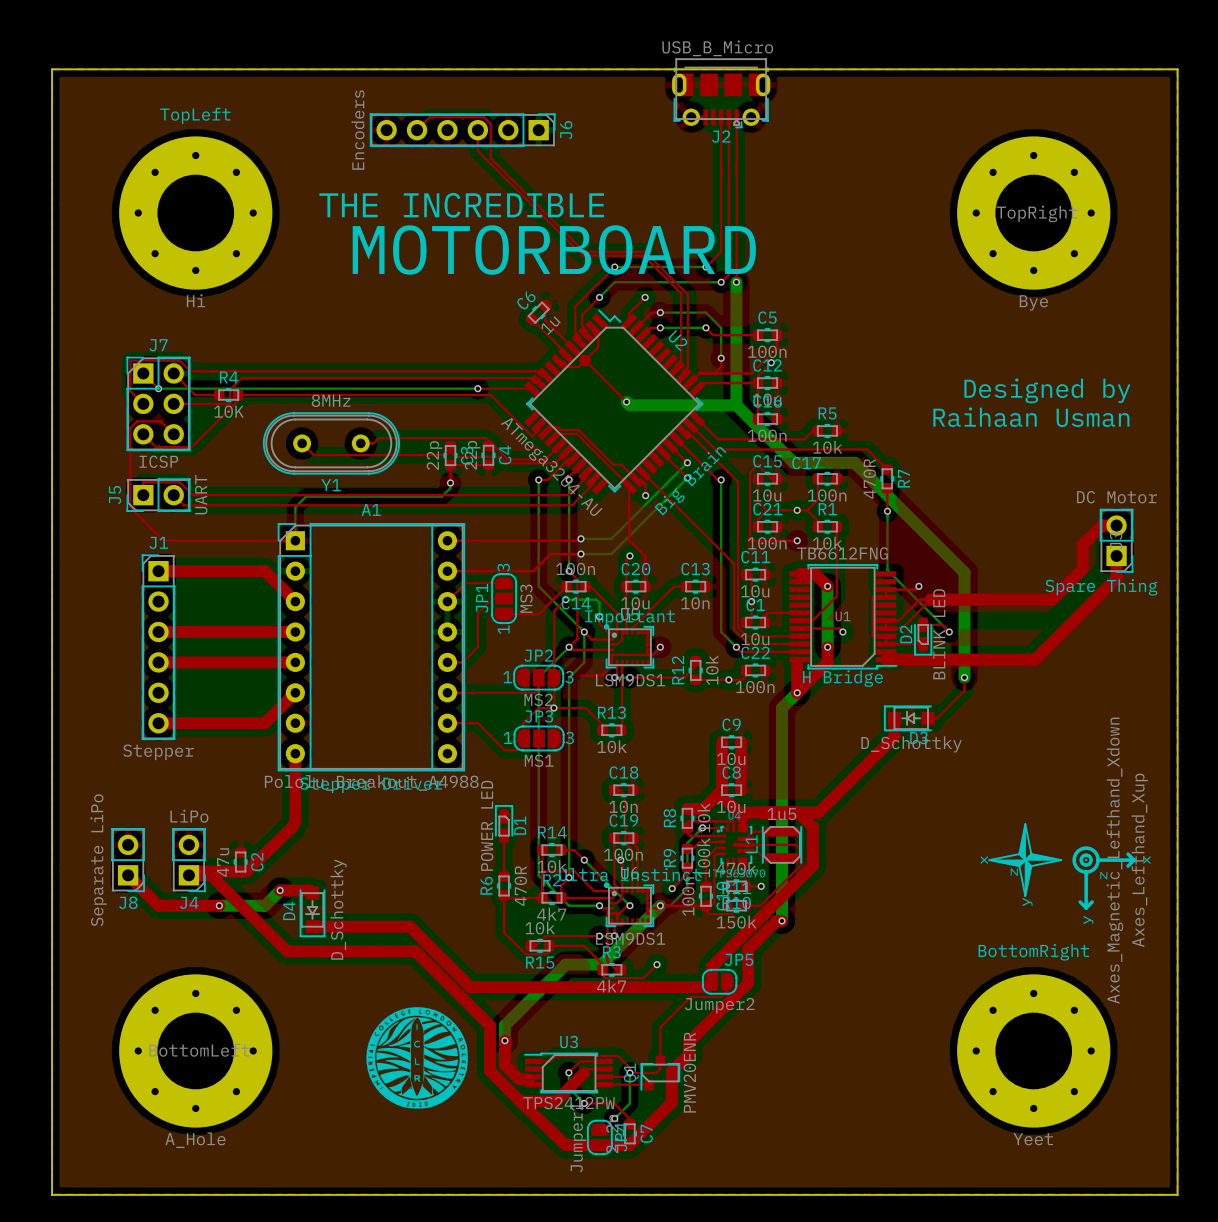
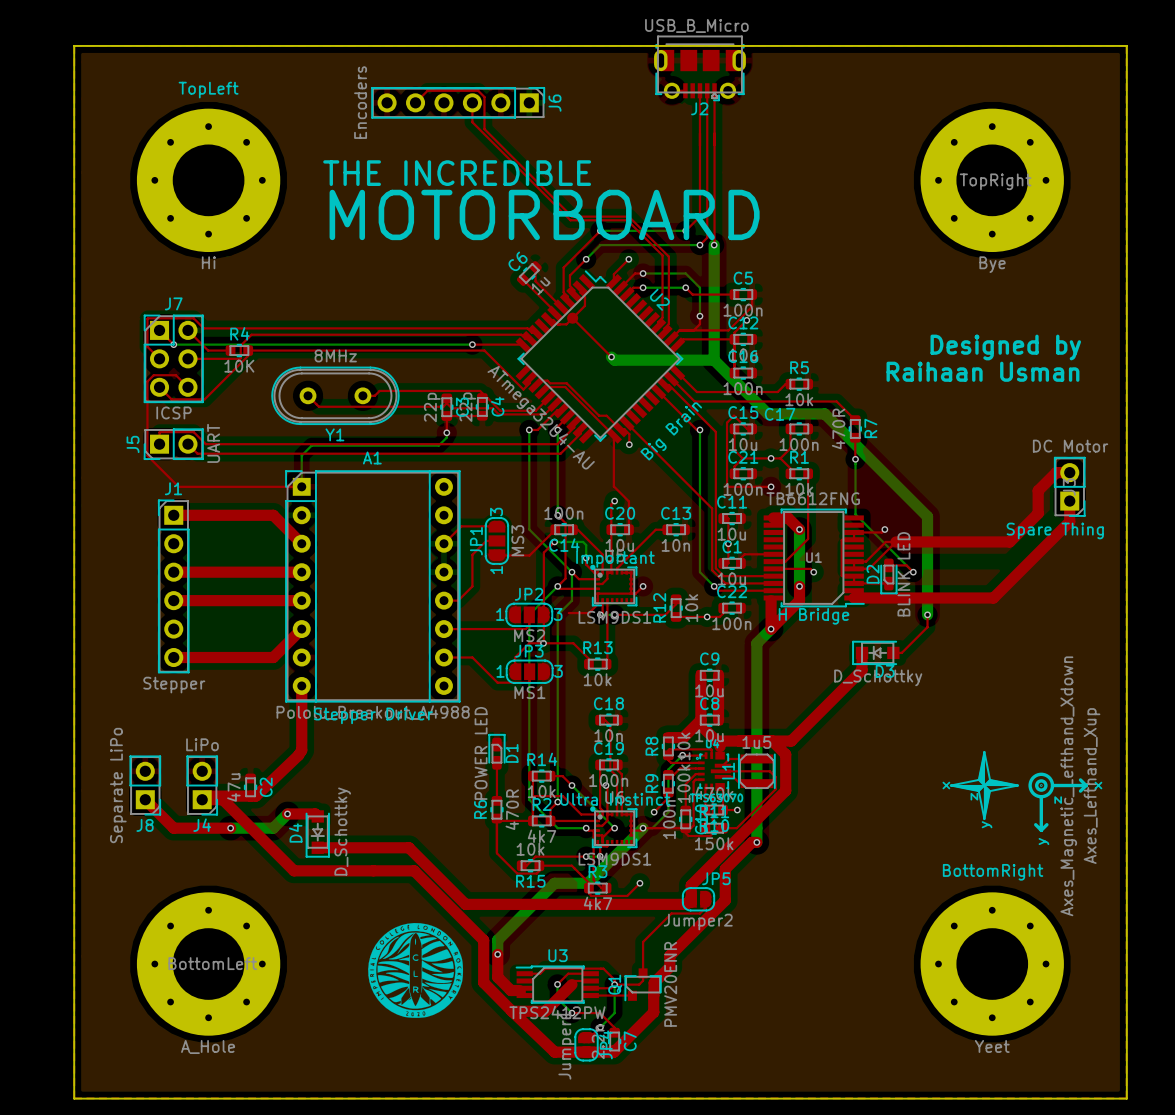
top track: (670, 445) (687, 462) -> none
top track: (663, 452) (687, 478) -> none
bottom track: (687, 462) (611, 538) (580, 538) -> none
via: (687, 462) -> none
bottom track: (687, 478) (611, 554) (580, 554) -> none
via: (687, 478) -> none
top track: (580, 538) (579, 540) (447, 540) -> none
via: (580, 538) -> none
top track: (580, 554) (550, 554) (533, 571) (447, 571) -> none
via: (580, 554) -> none

